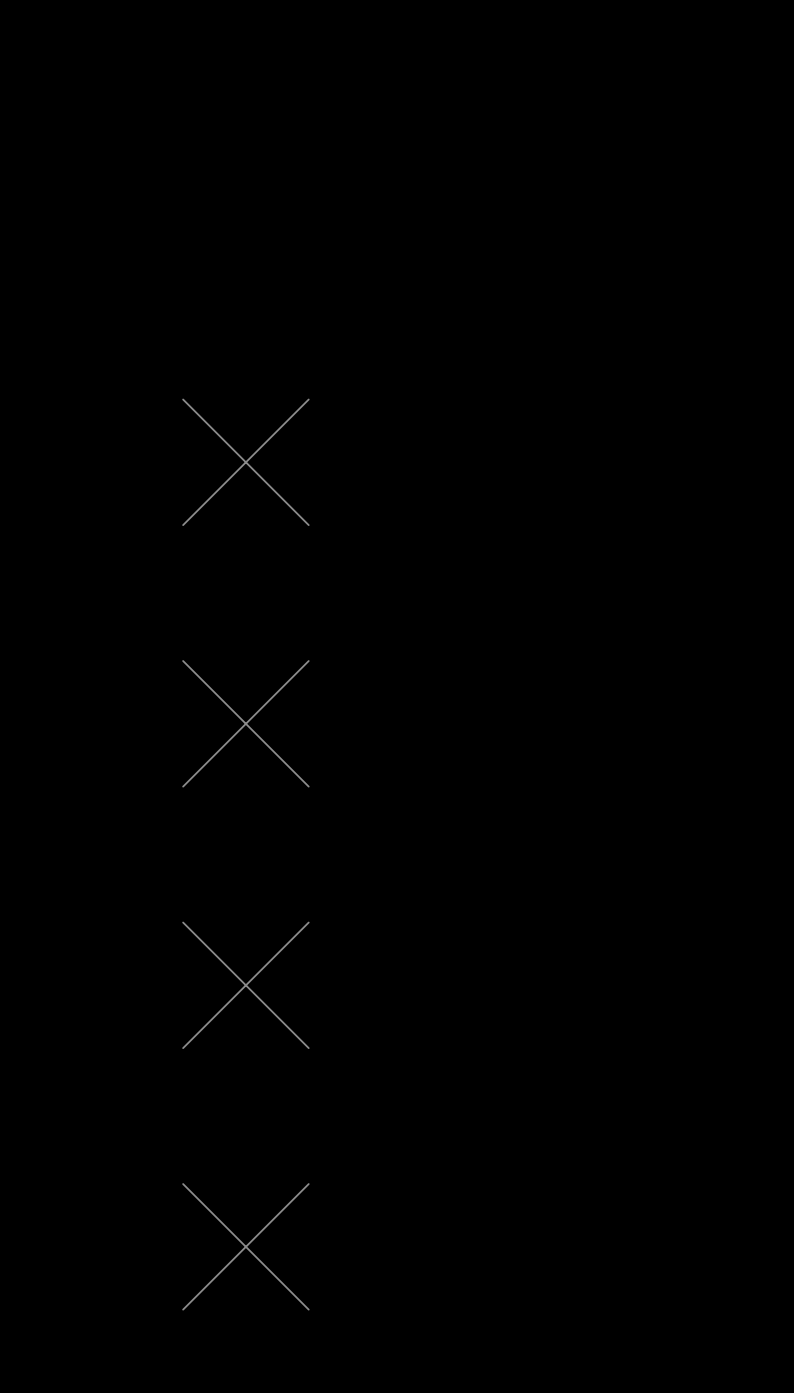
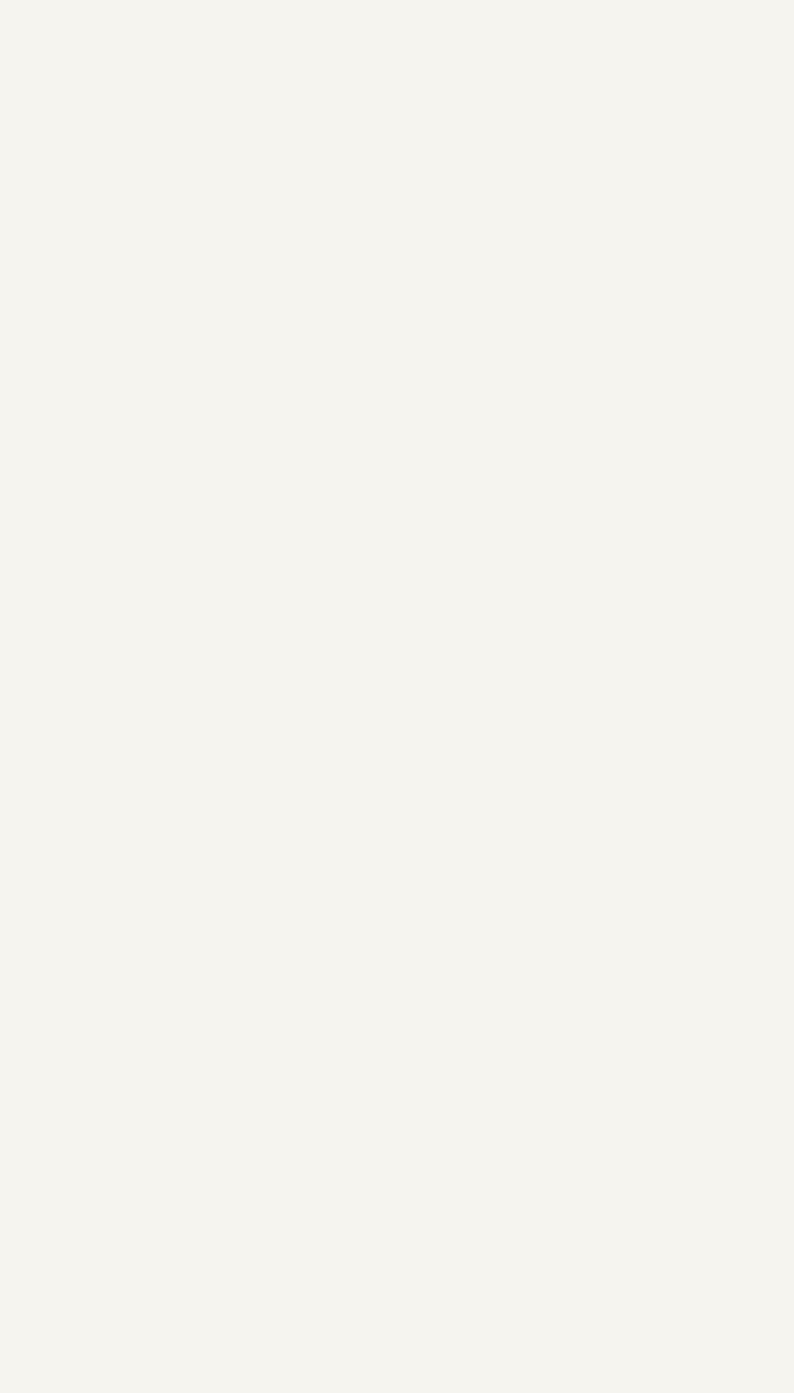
no-connect mark: (245, 462) -> none
no-connect mark: (245, 723) -> none
no-connect mark: (245, 985) -> none
no-connect mark: (245, 1246) -> none

